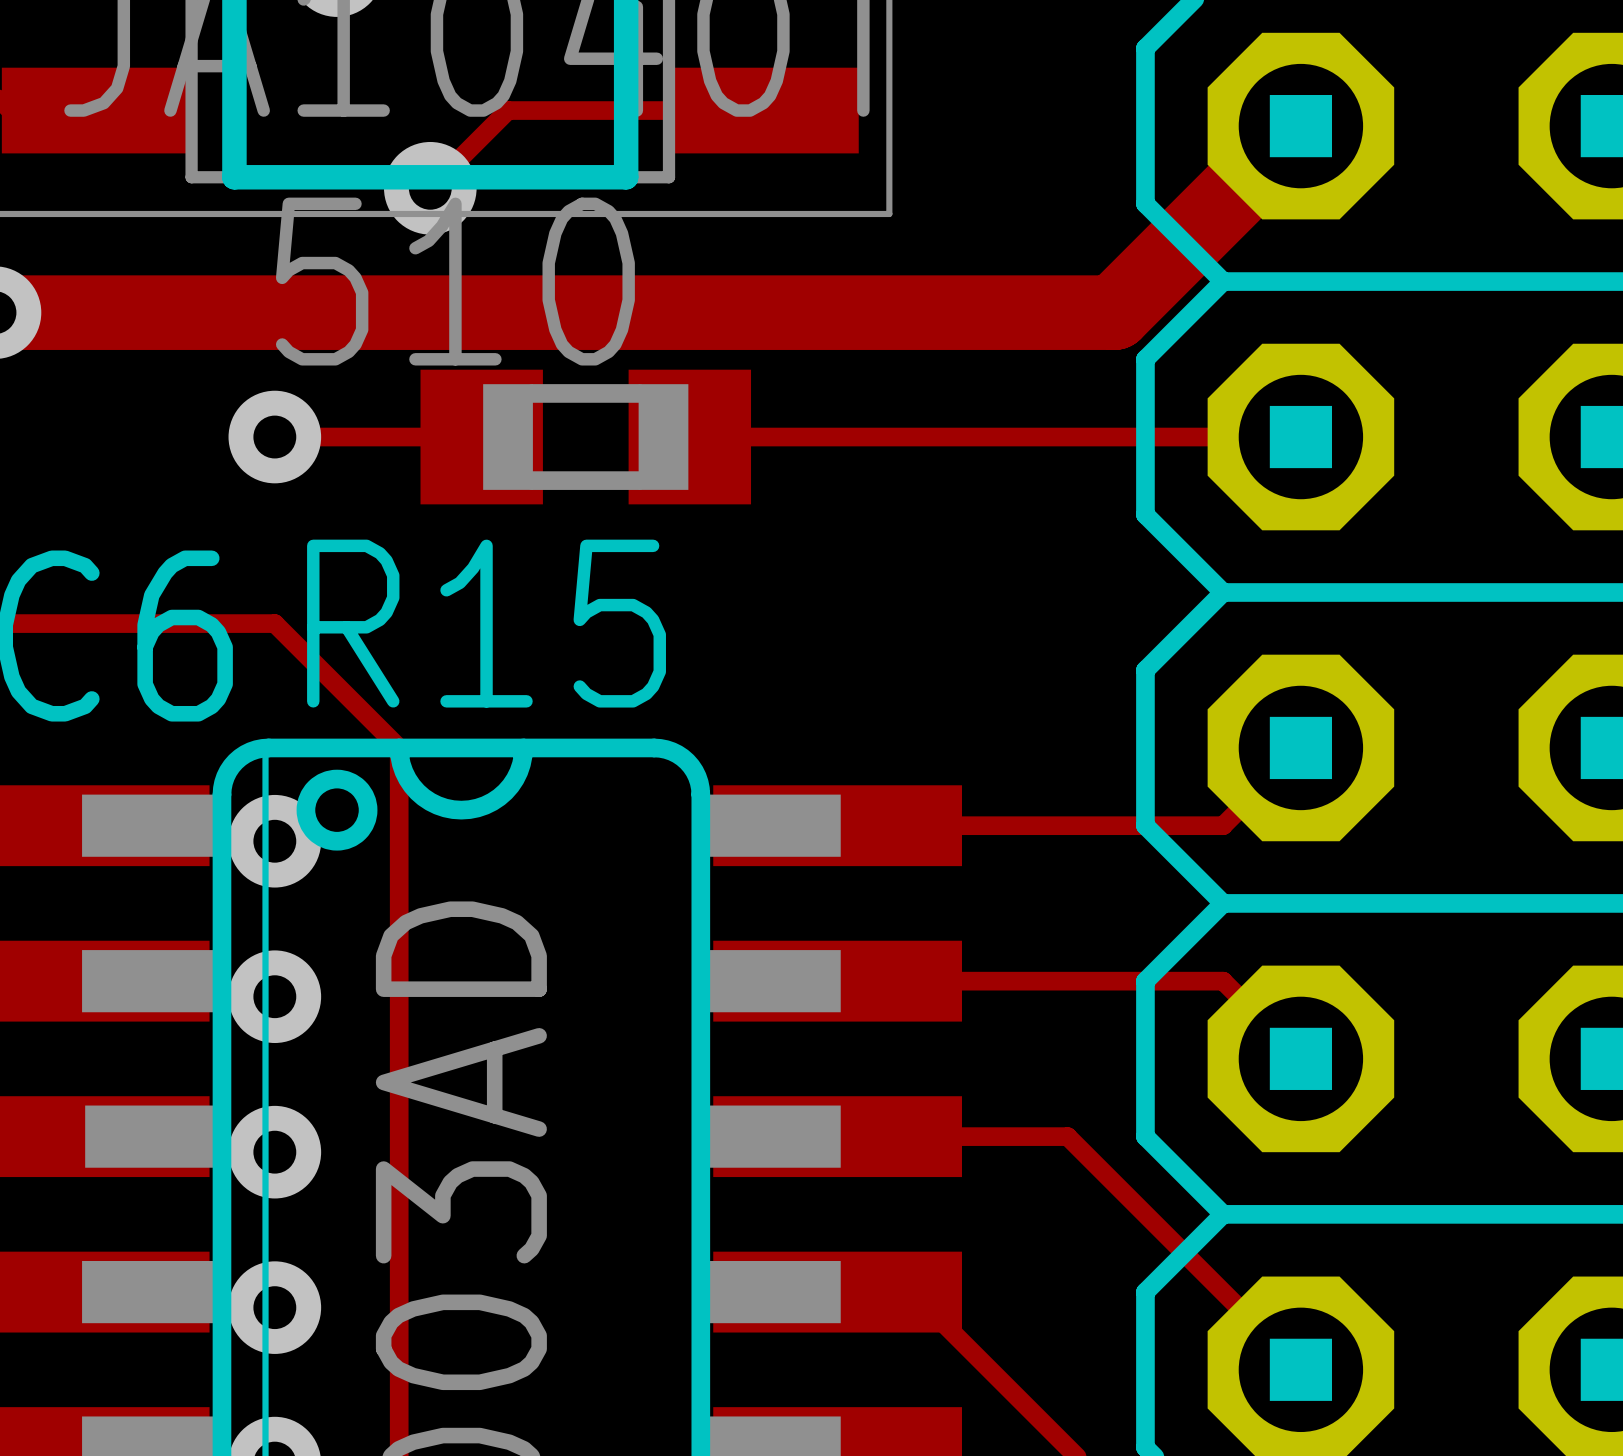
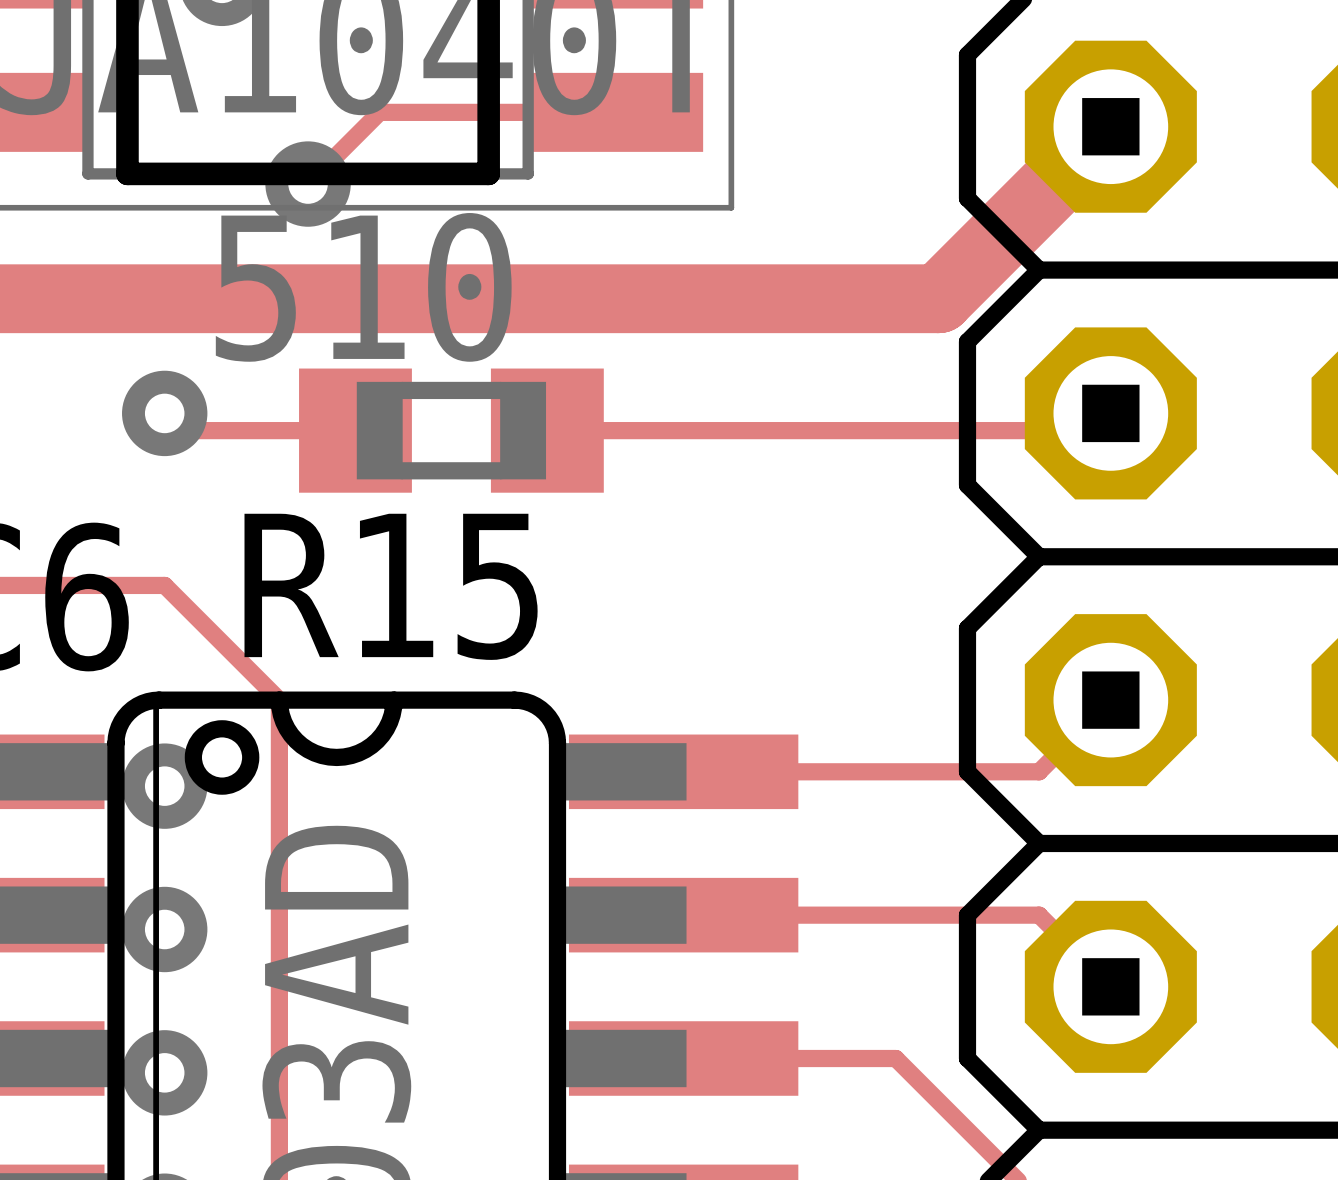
track: (274, 437) (481, 437) -> (164, 413) (181, 430) (355, 430)
R15 position: (585, 437) -> (451, 430)
track: (689, 437) (1300, 437) -> (547, 430) (1093, 430) (1110, 413)

